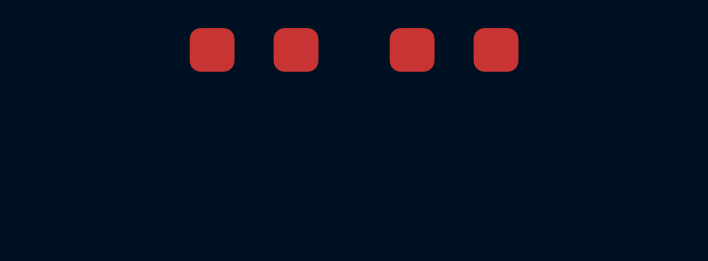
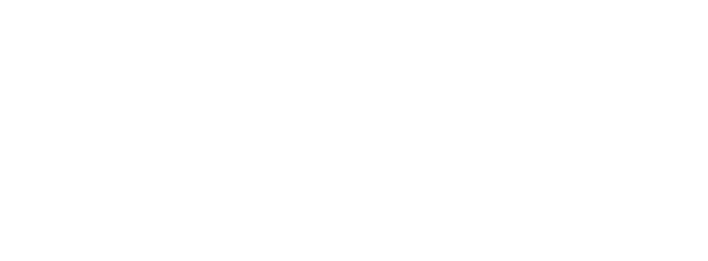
part: (254, 49) -> none
part: (454, 49) -> none

